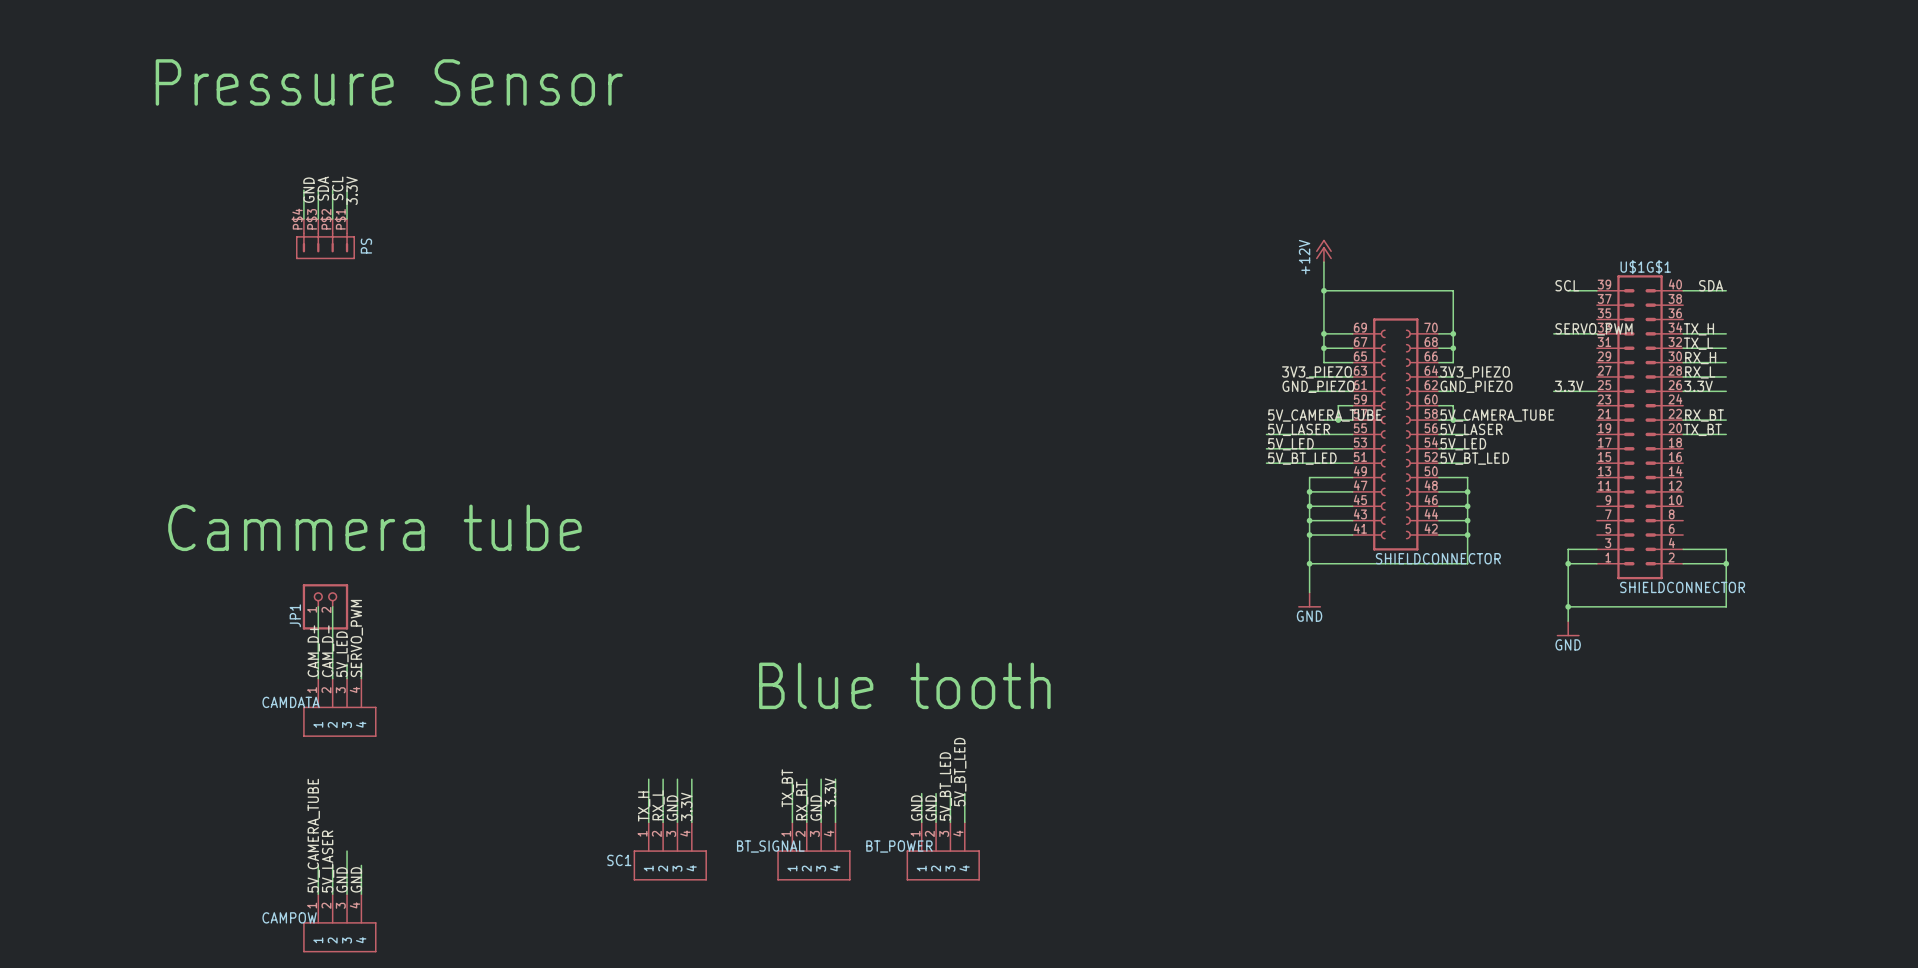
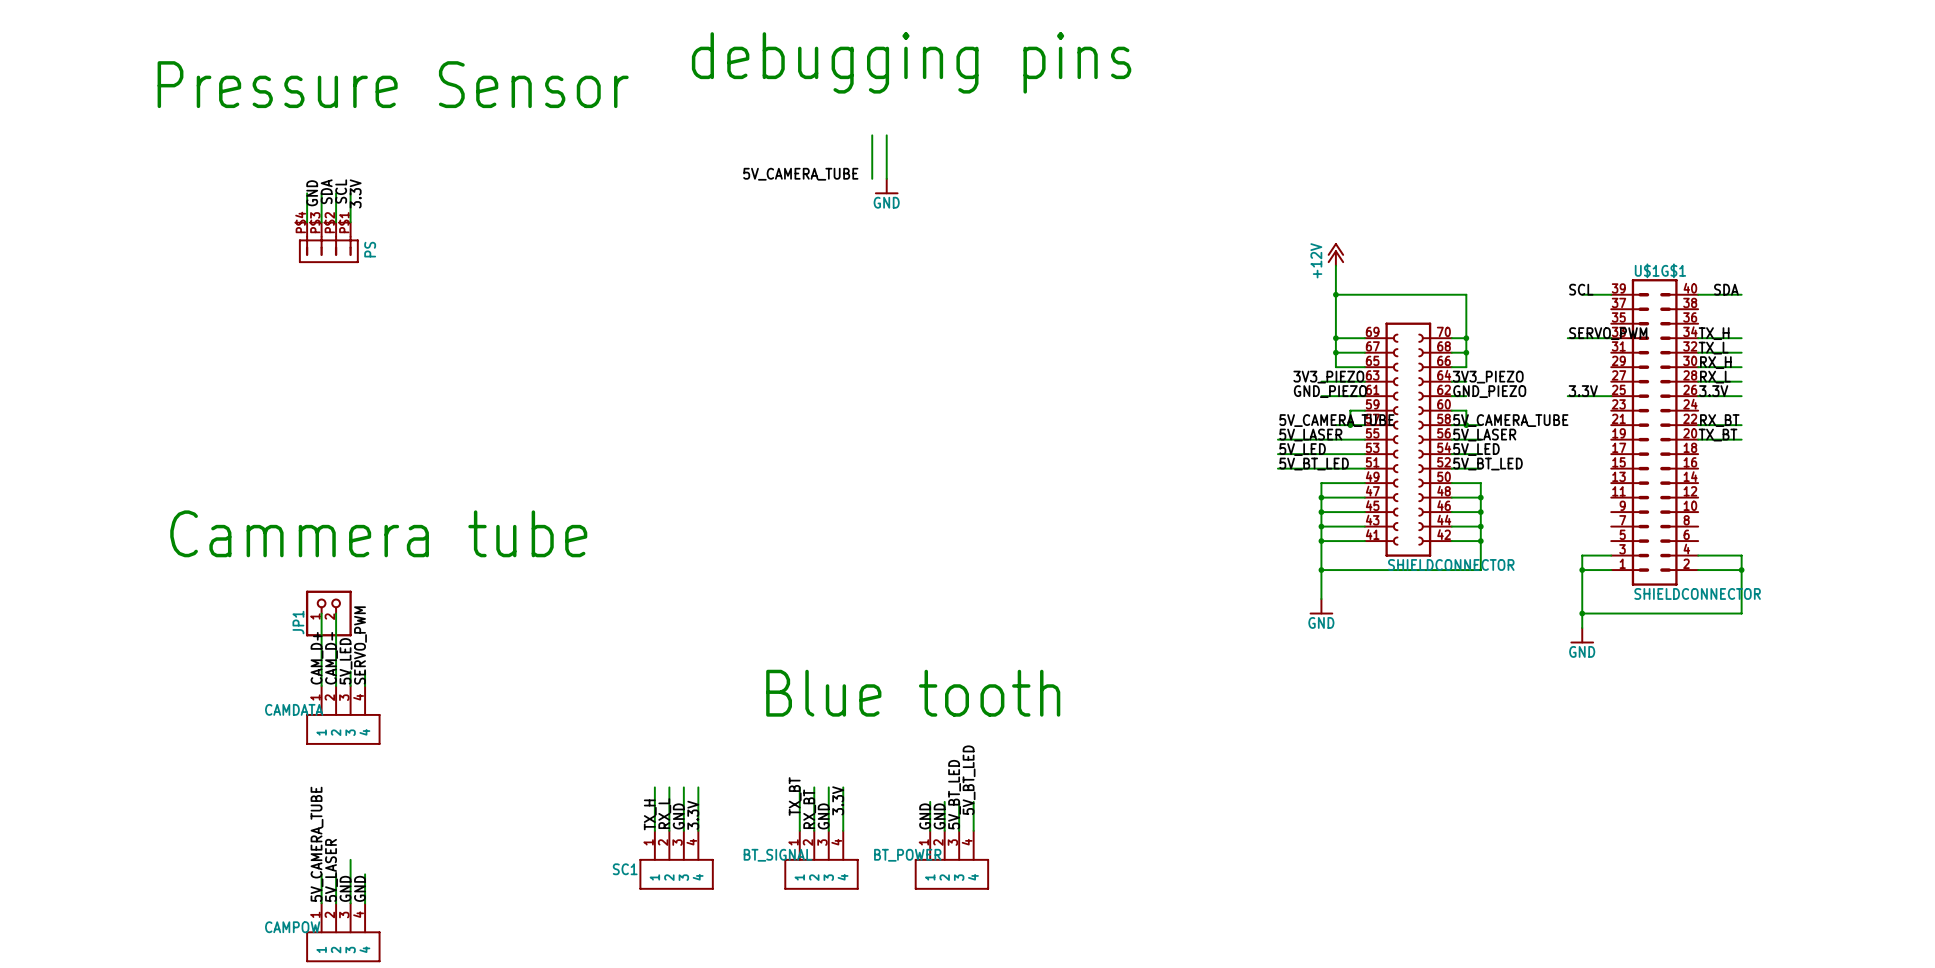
text: none -> debugging pins (911, 62)
wire: none -> (872, 135) (872, 178)
wire: none -> (886, 135) (886, 178)
label: none -> 5V_CAMERA_TUBE (800, 174)
power symbol: none -> GND (886, 186)

